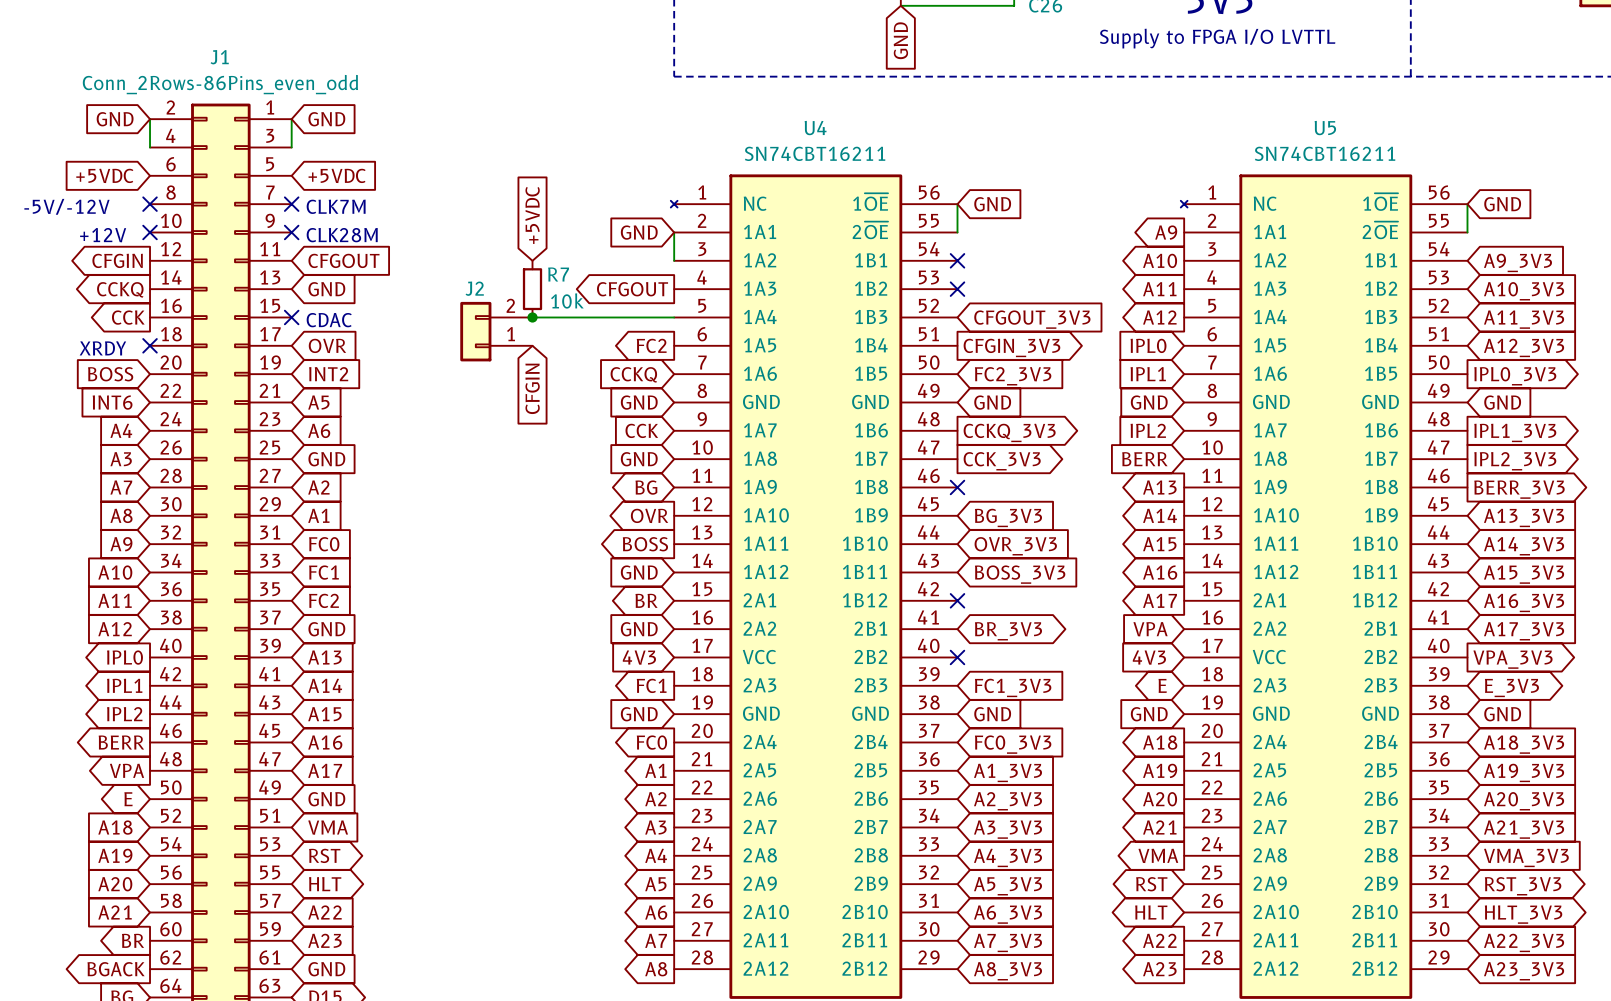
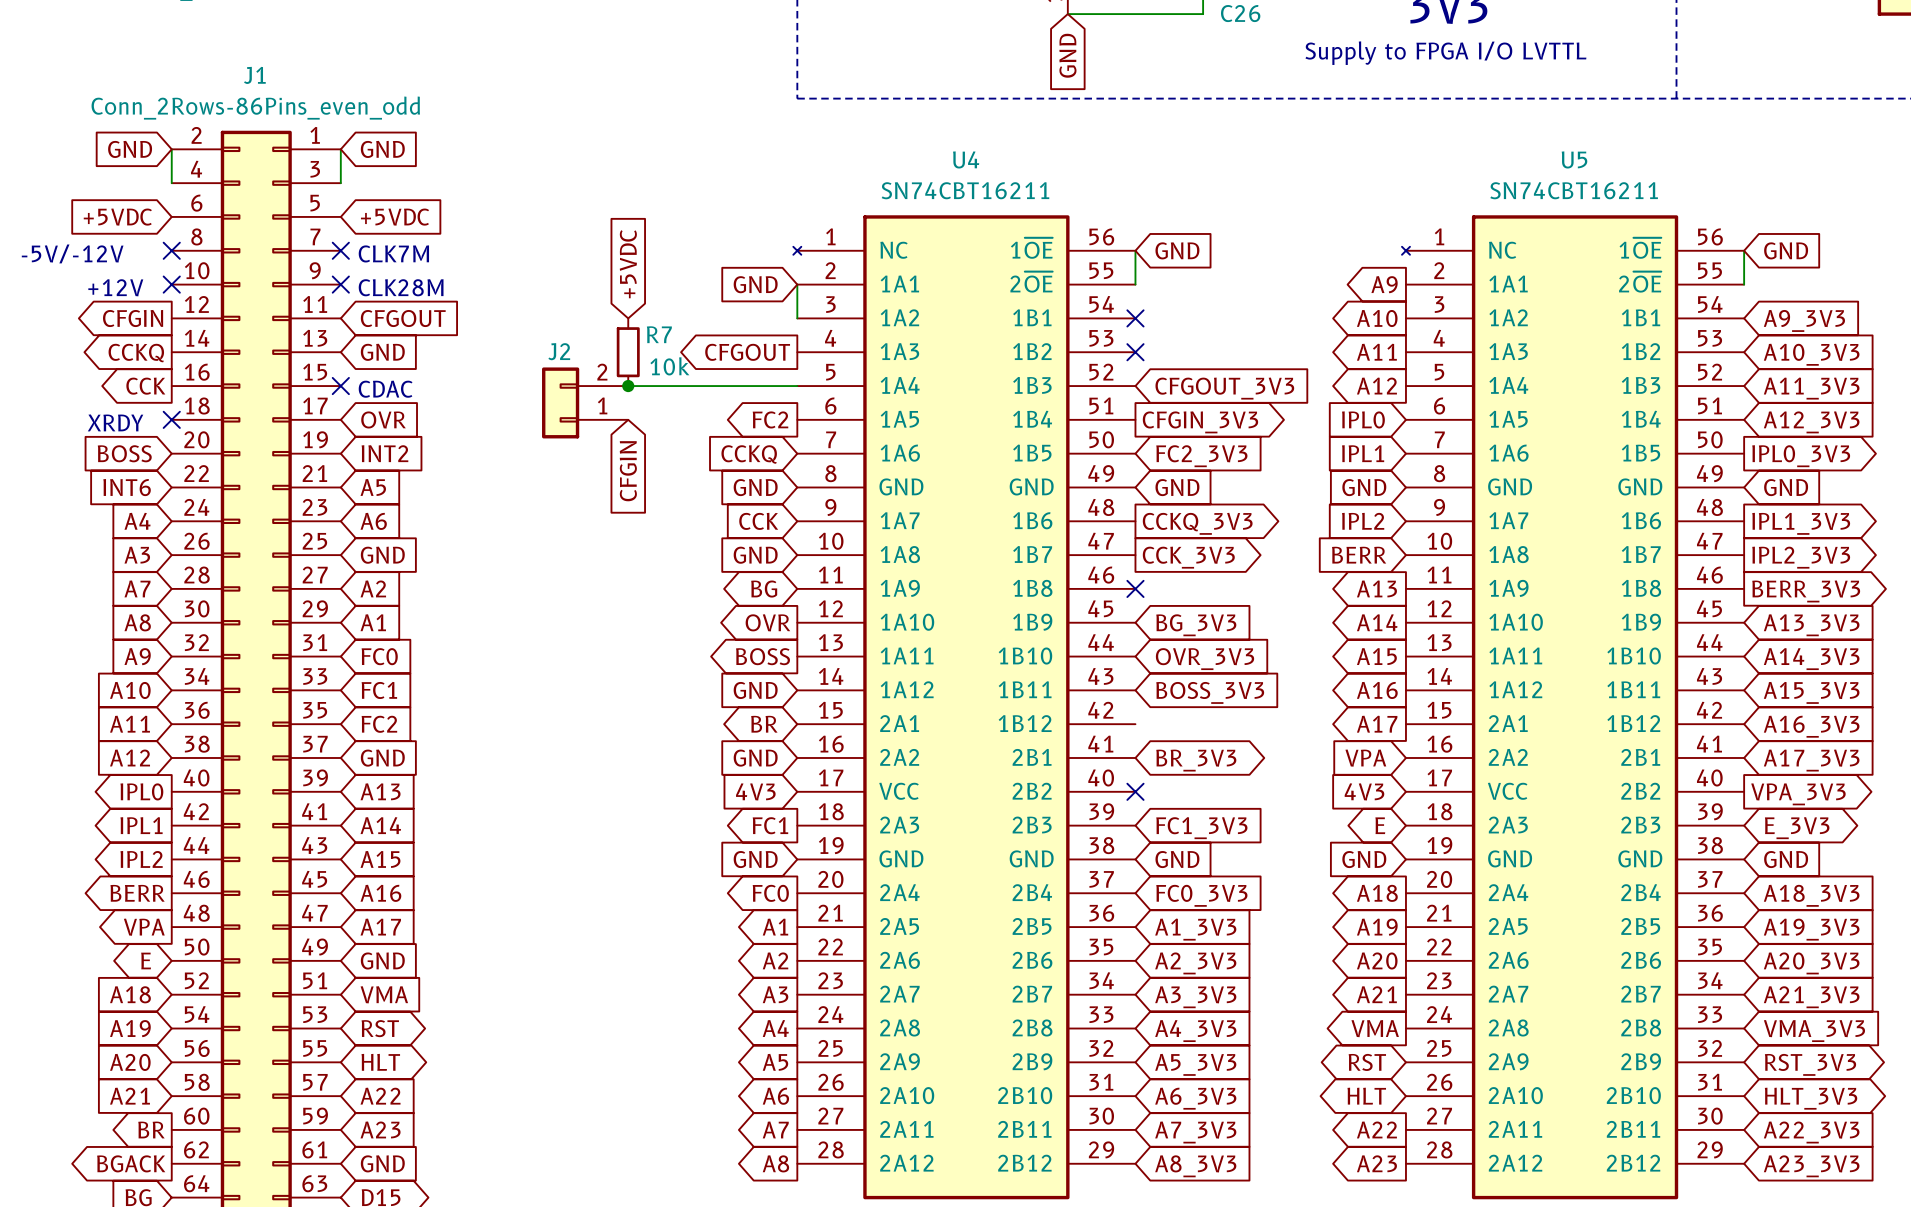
no-connect mark: (957, 600) -> none

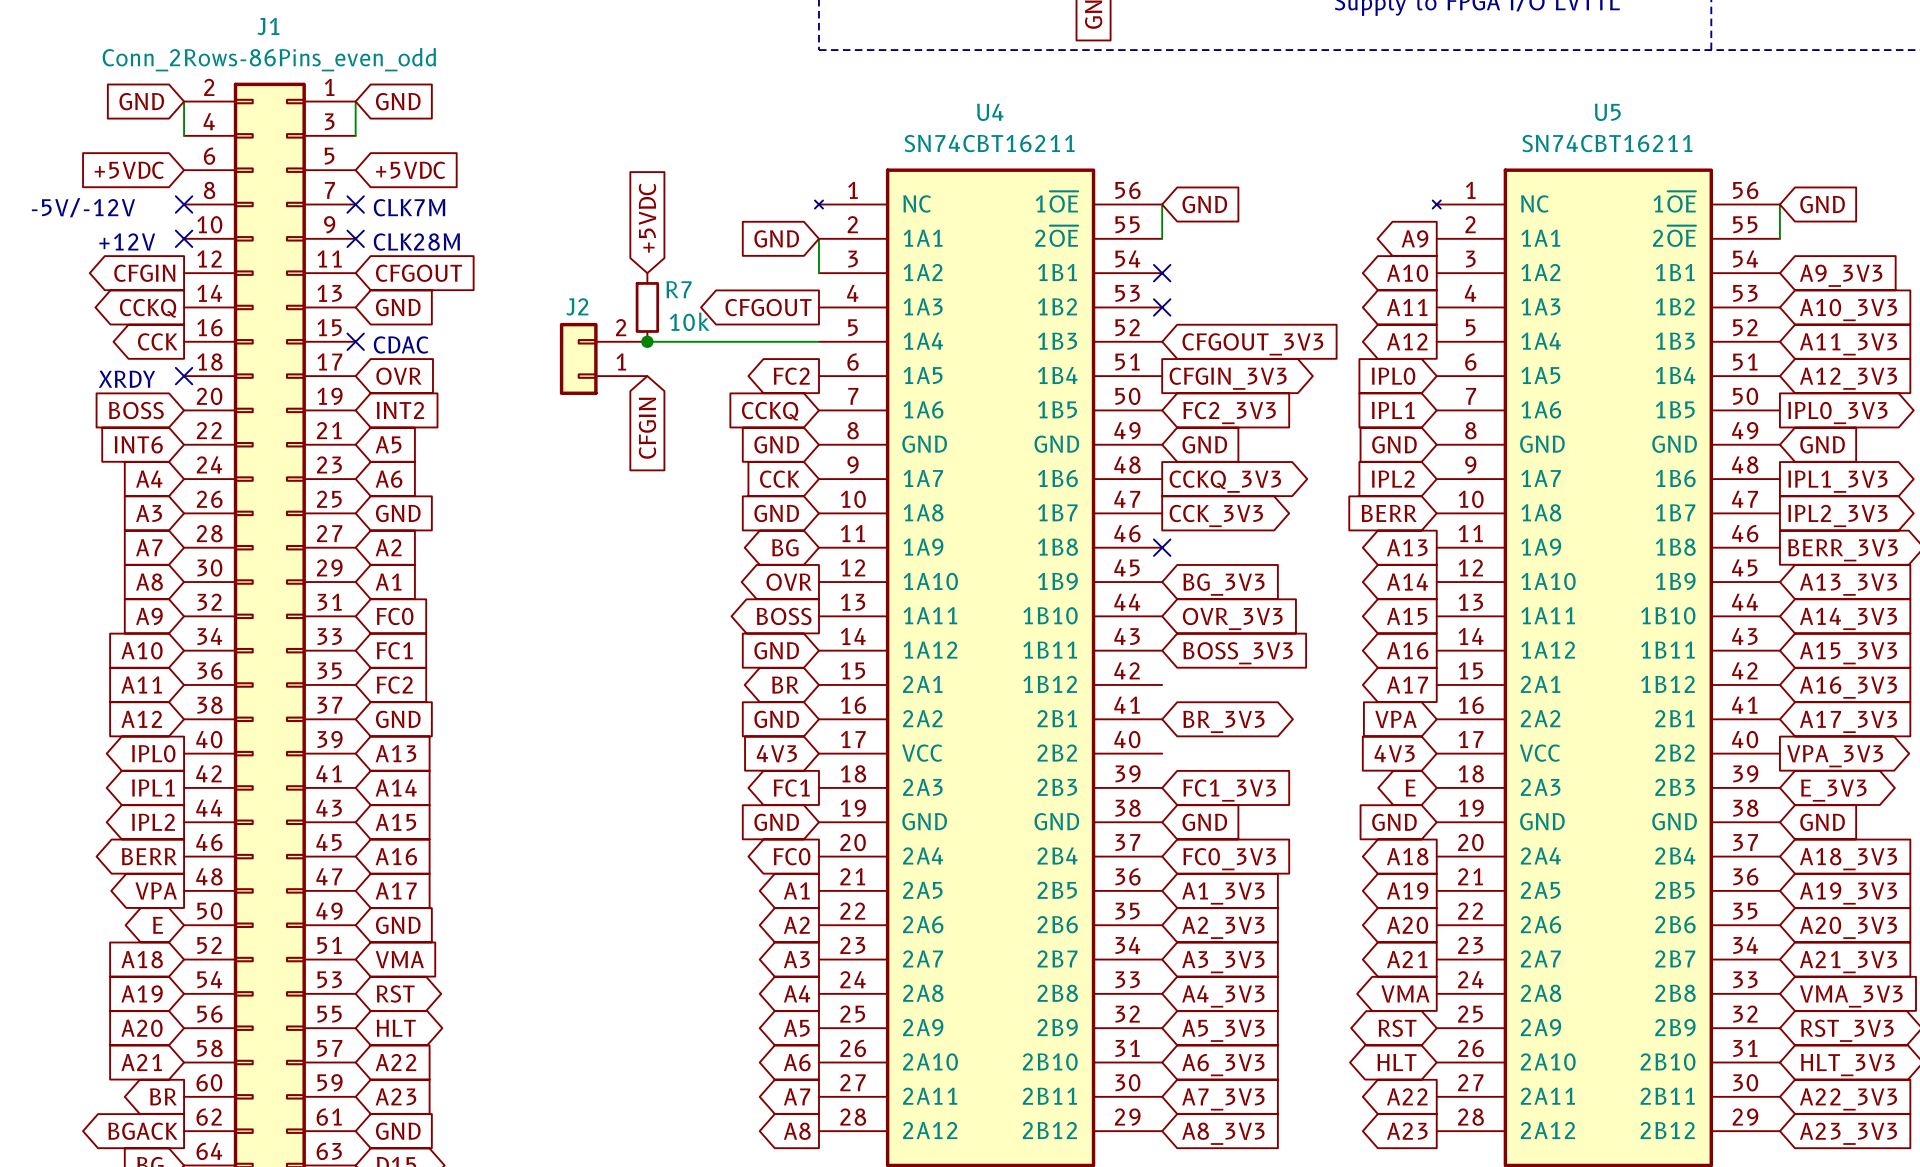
no-connect mark: (1135, 791) -> none

